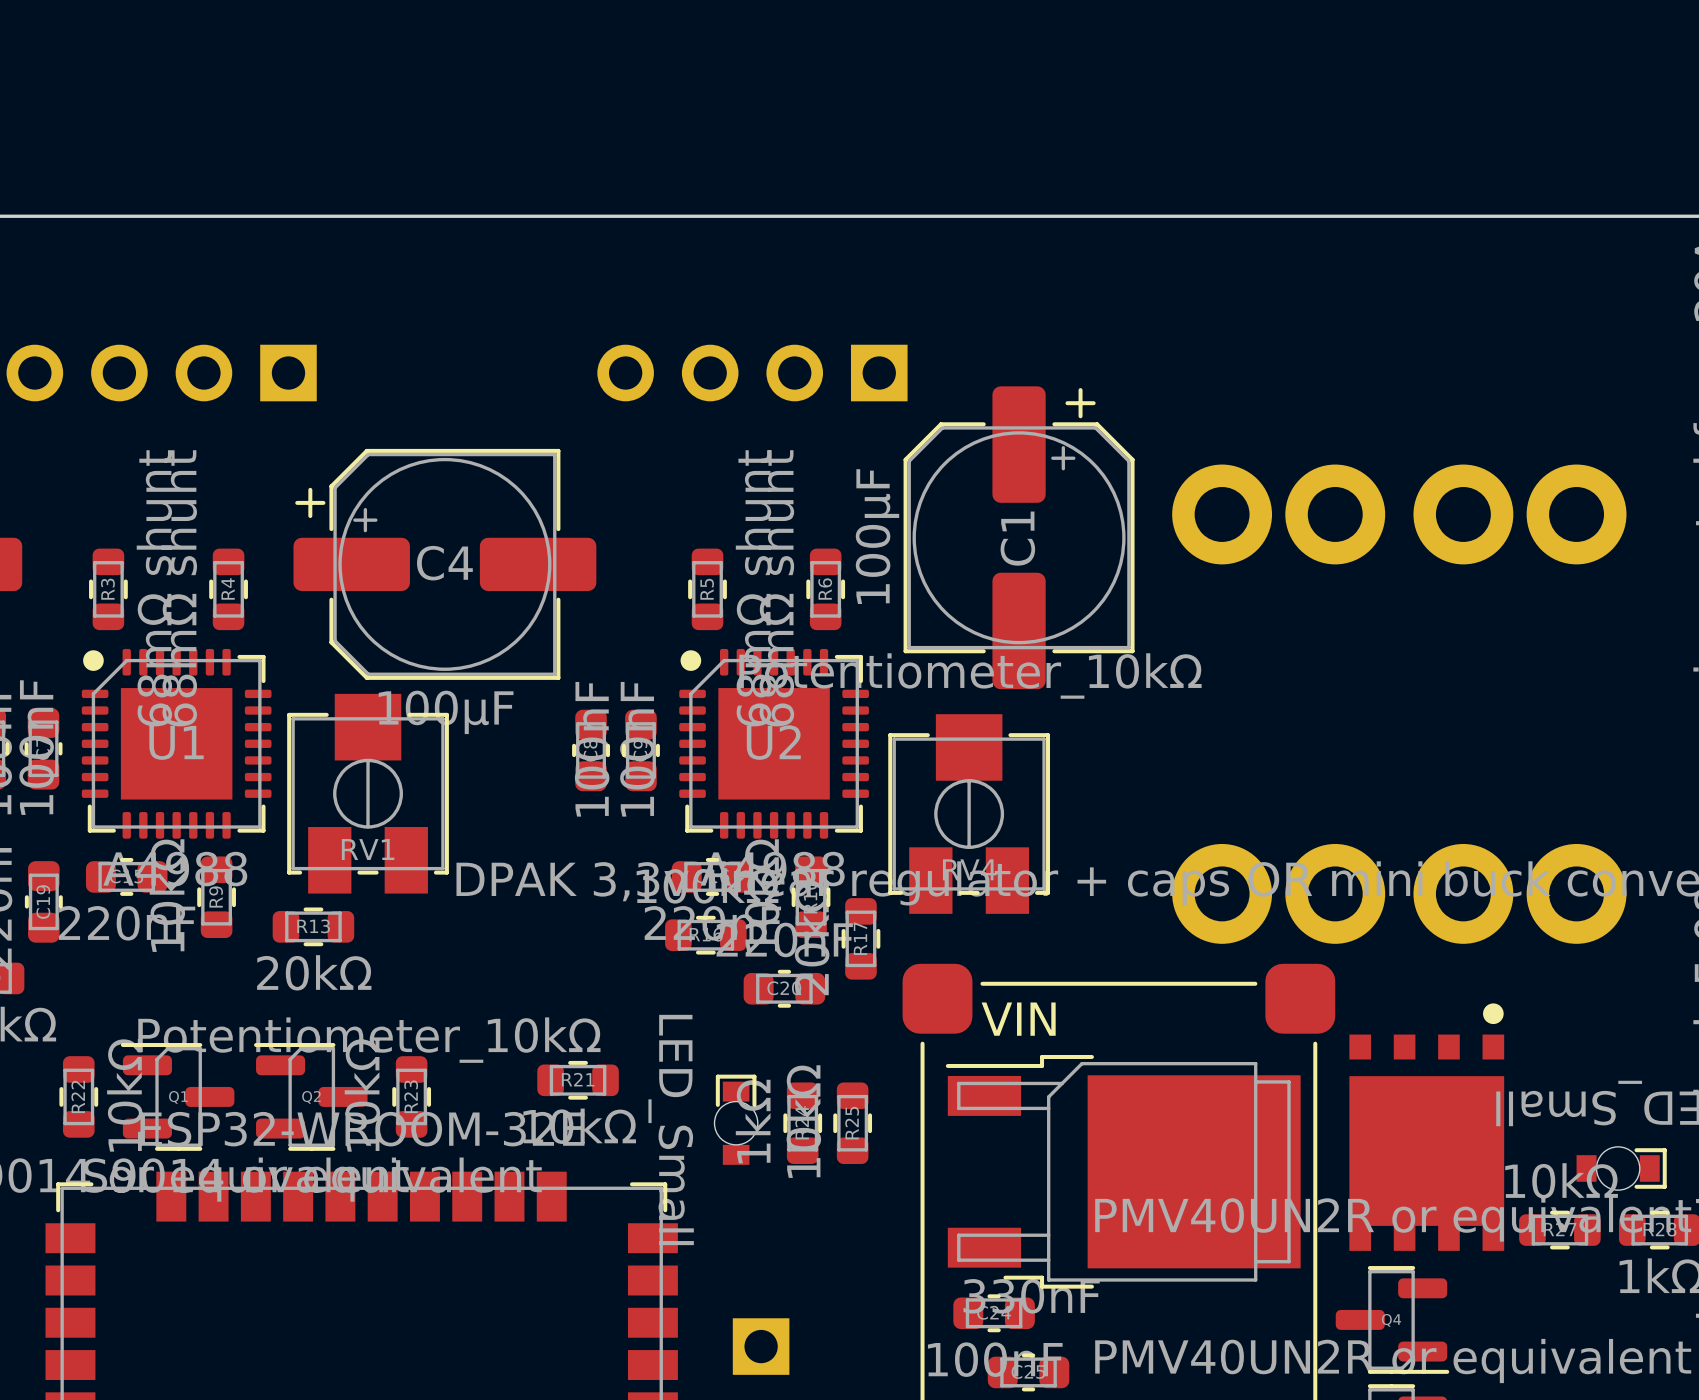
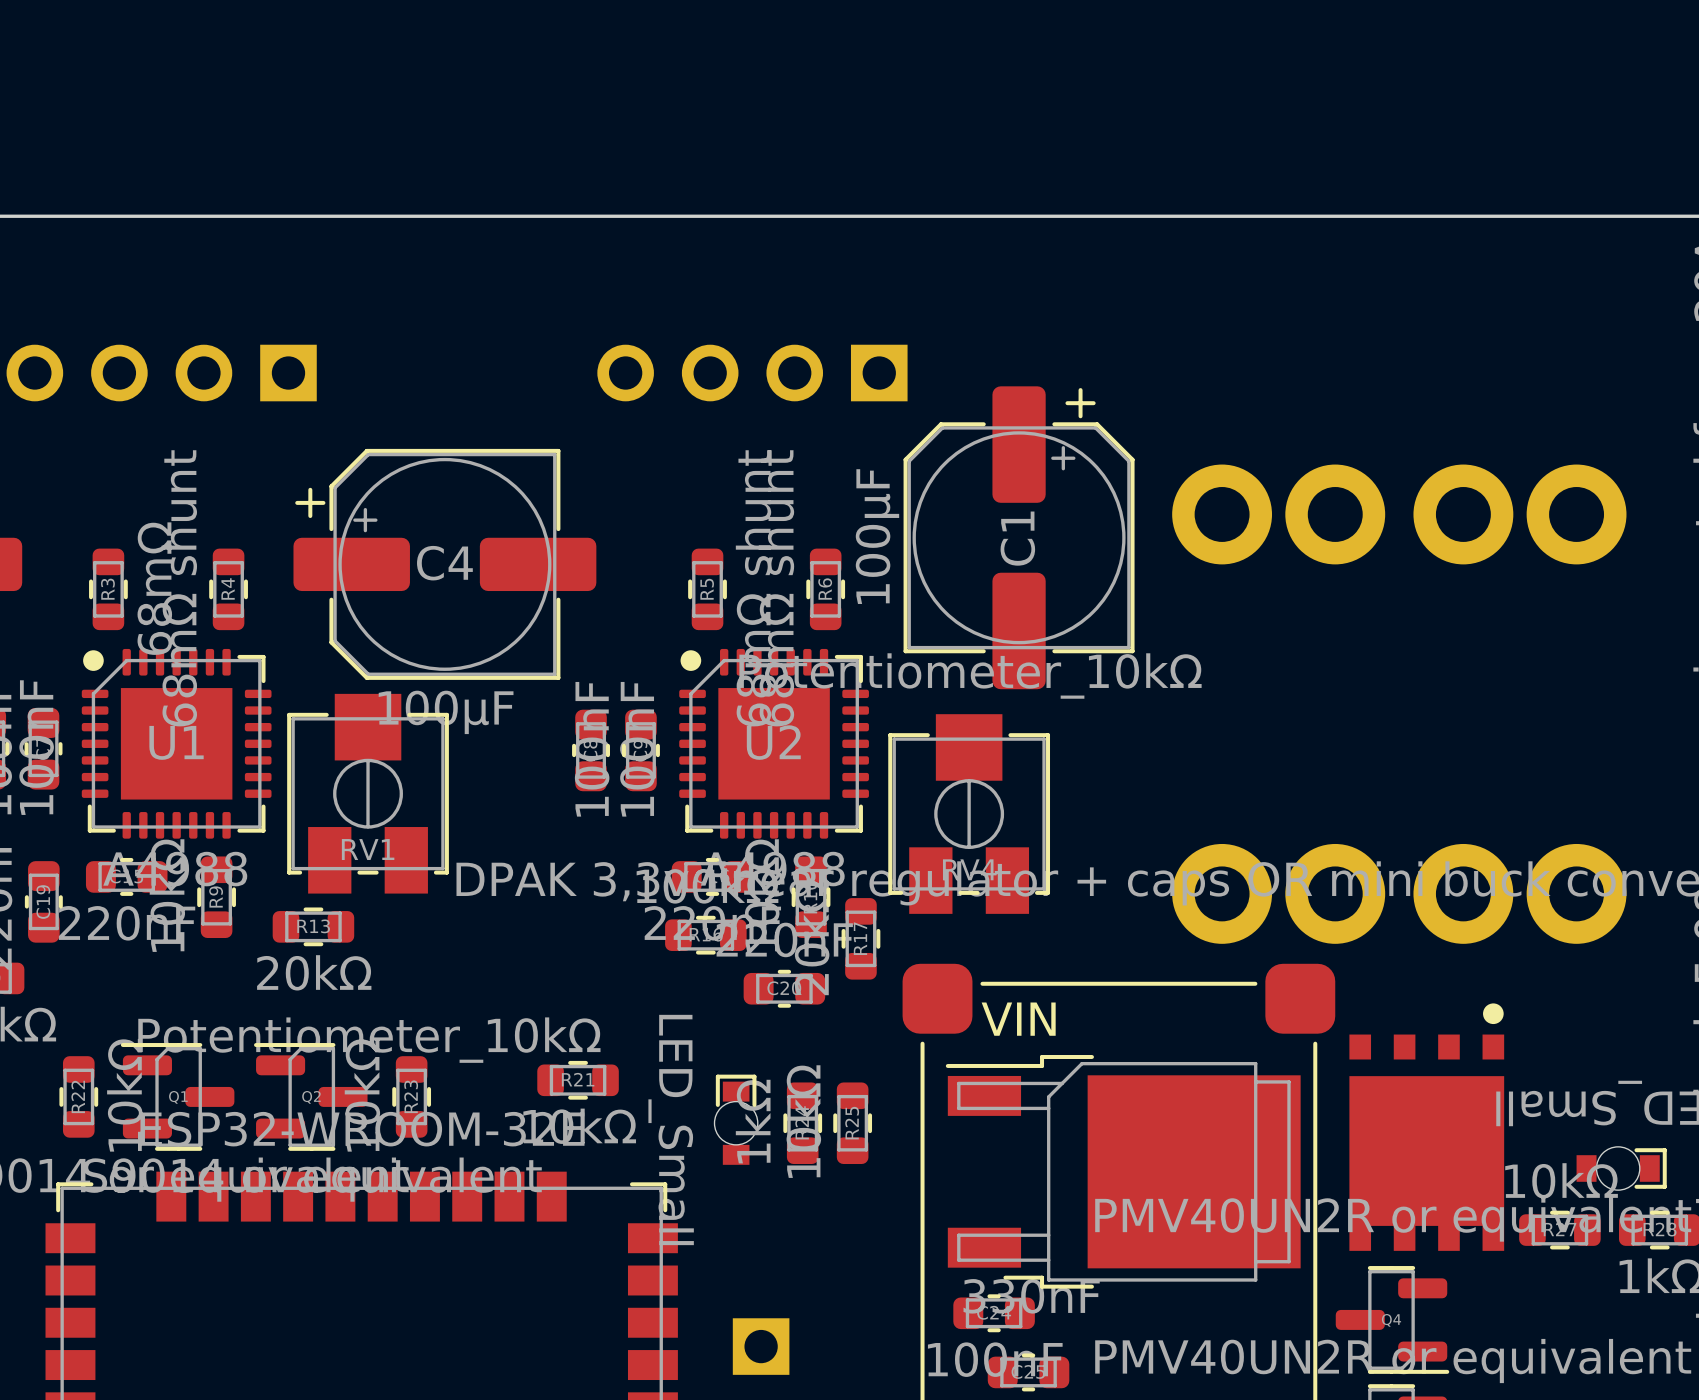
R3 value: 68mΩ shunt (154, 588) -> 68mΩ (154, 588)

